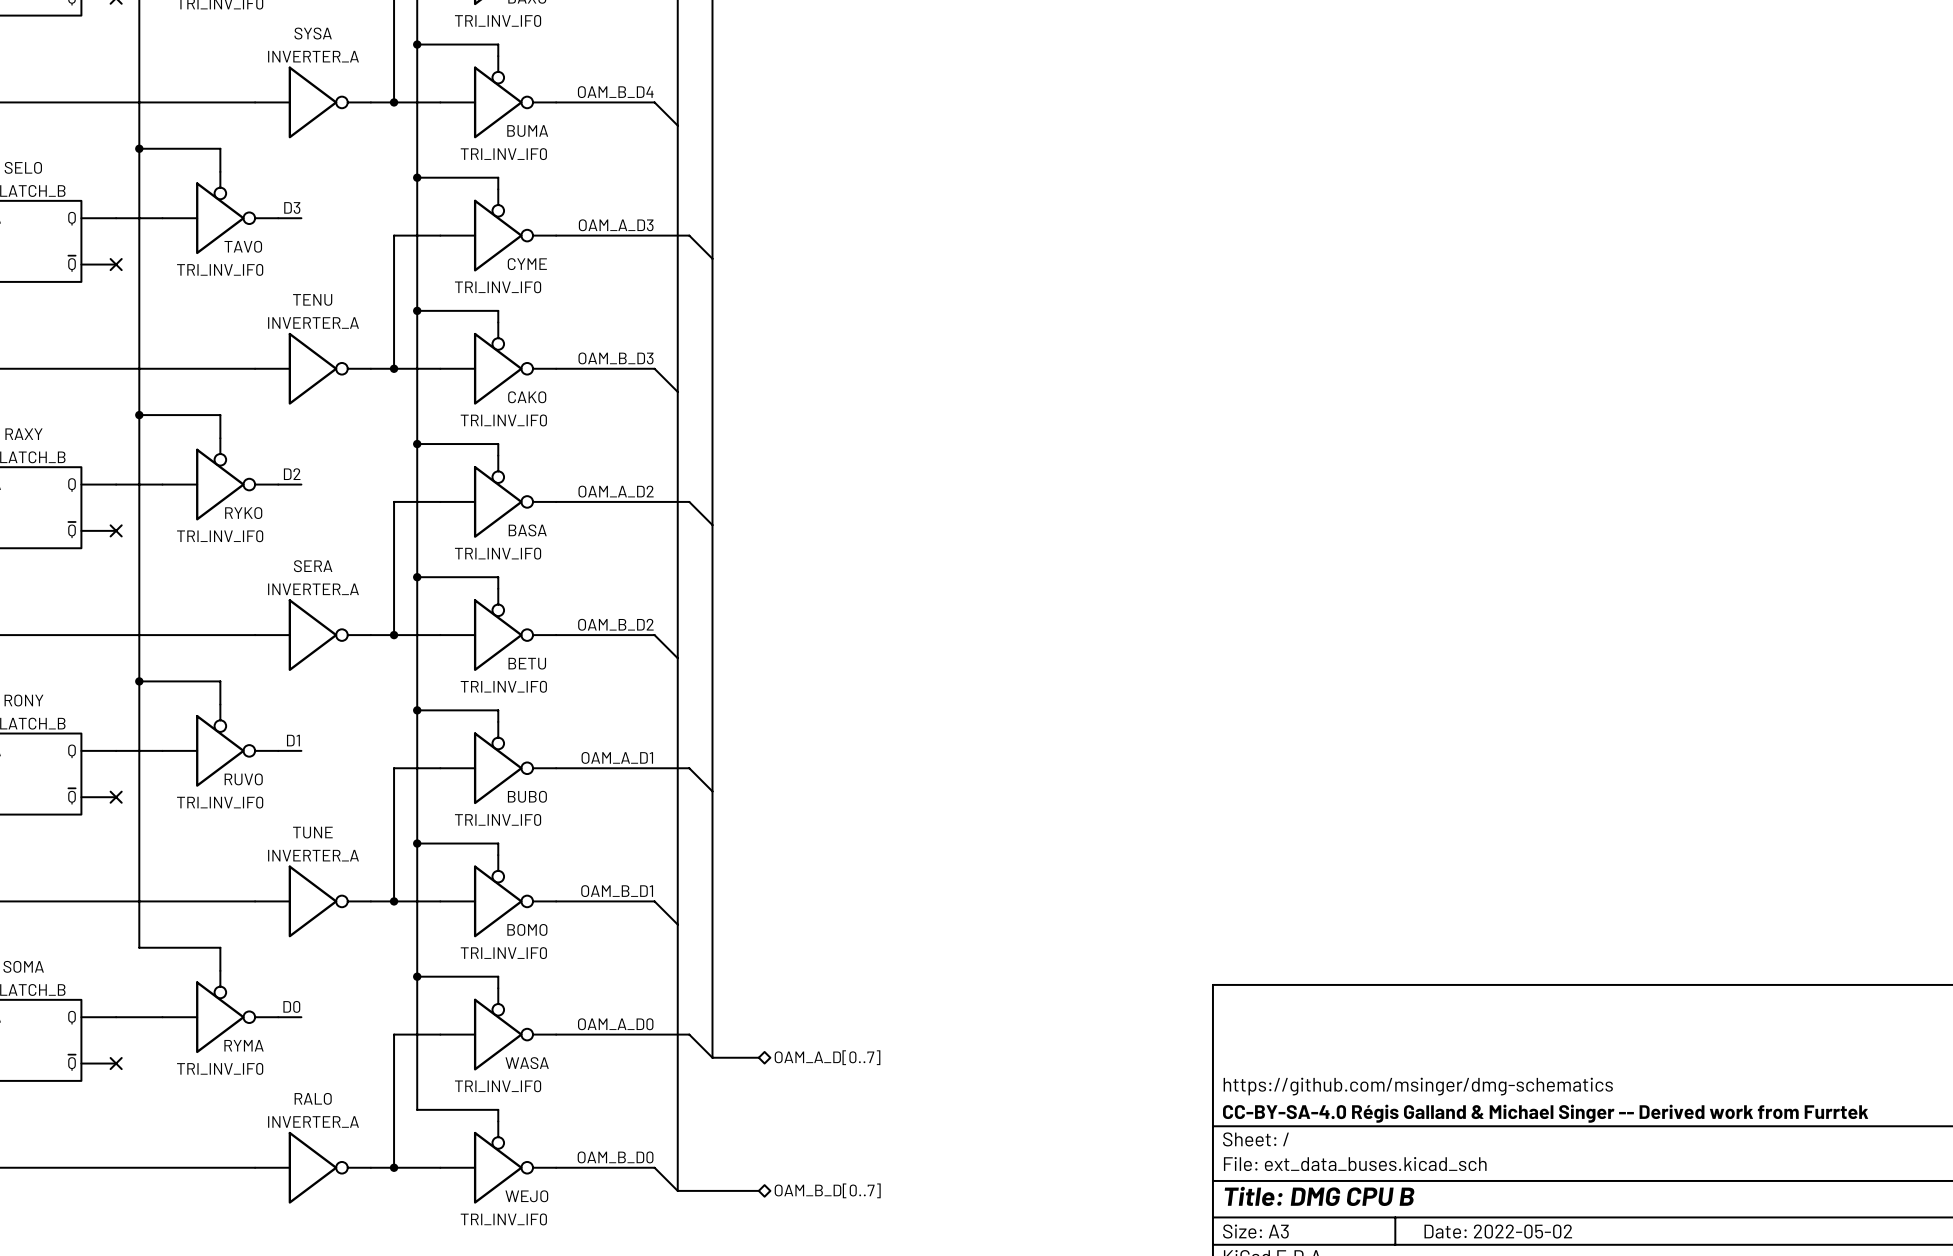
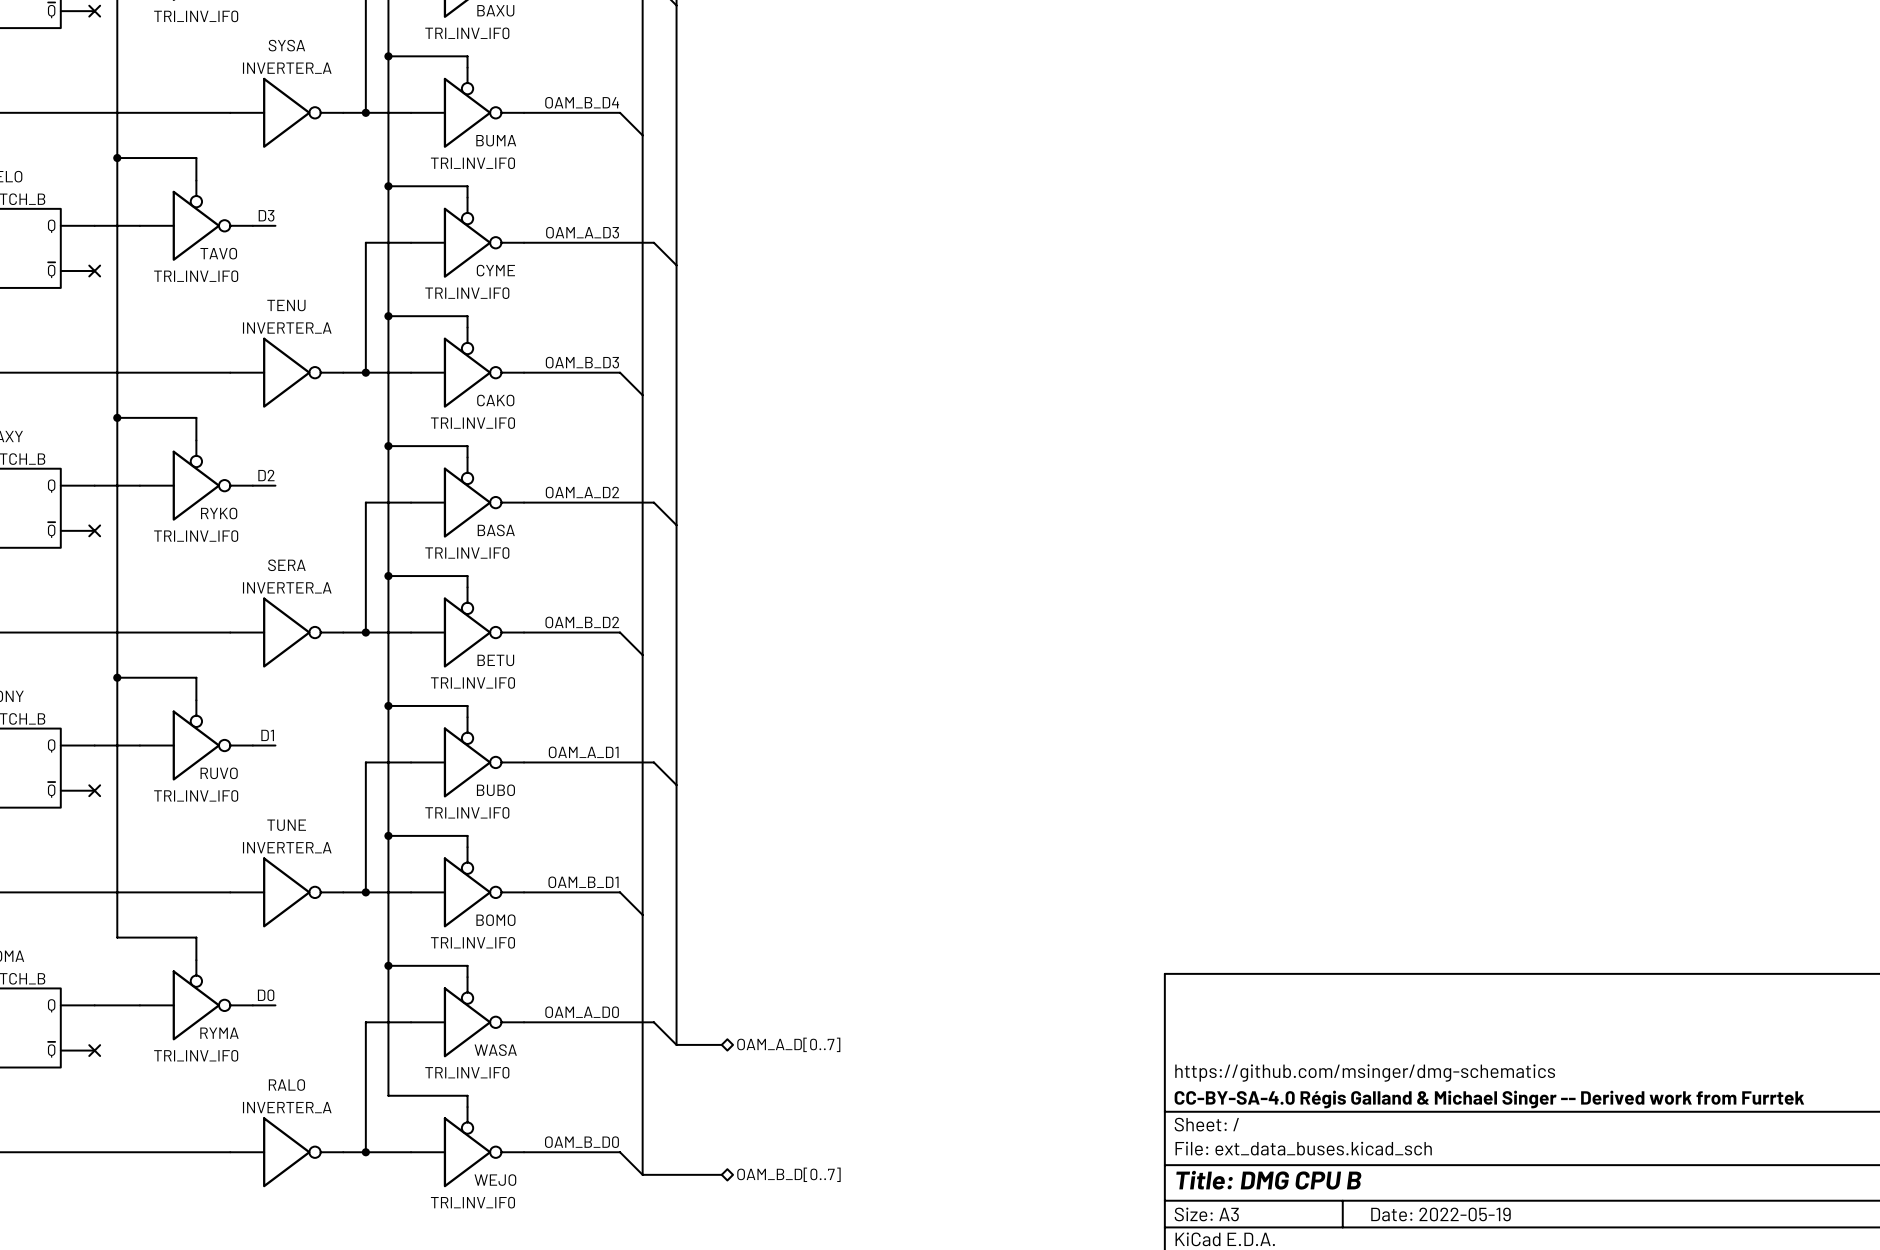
title block: Date: 2022-05-02 (1498, 1231) -> Date: 2022-05-19 (1440, 1214)

